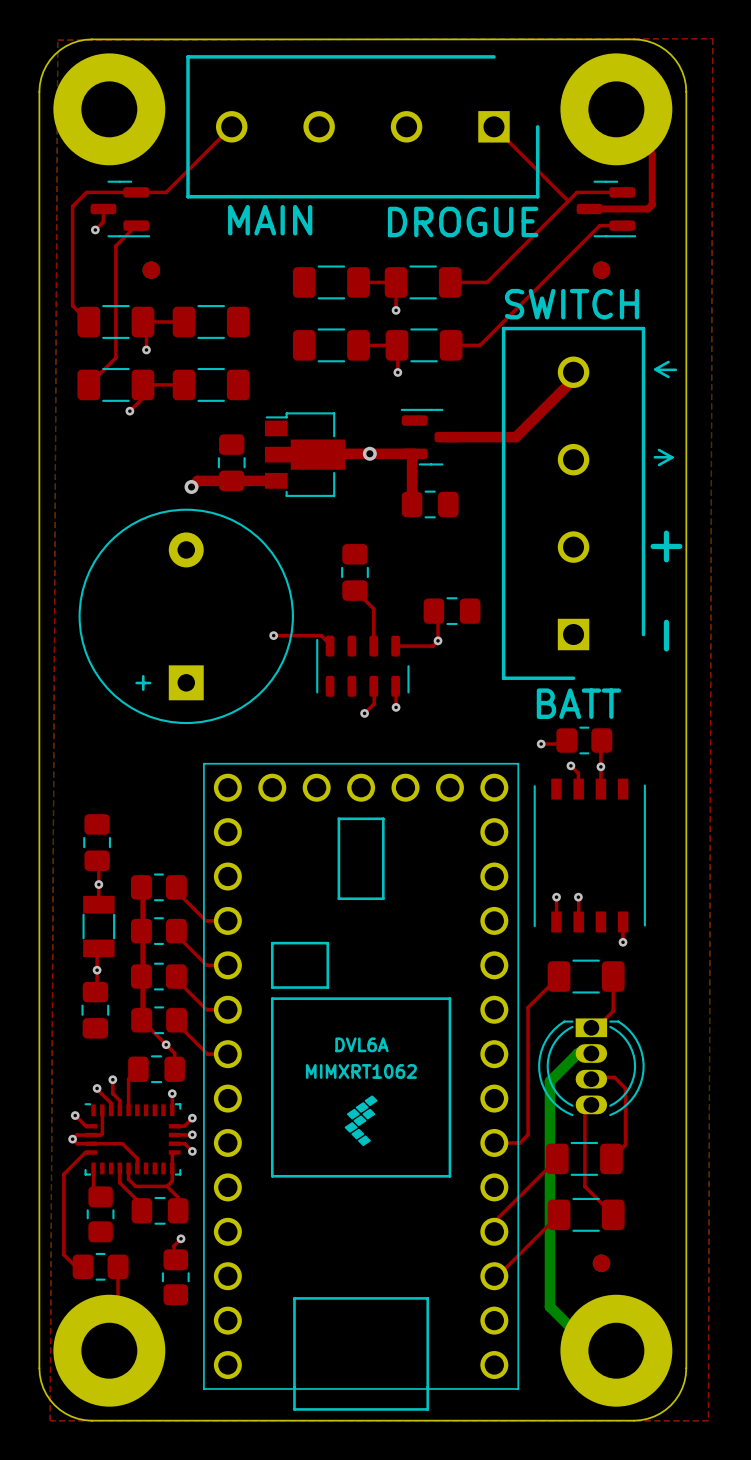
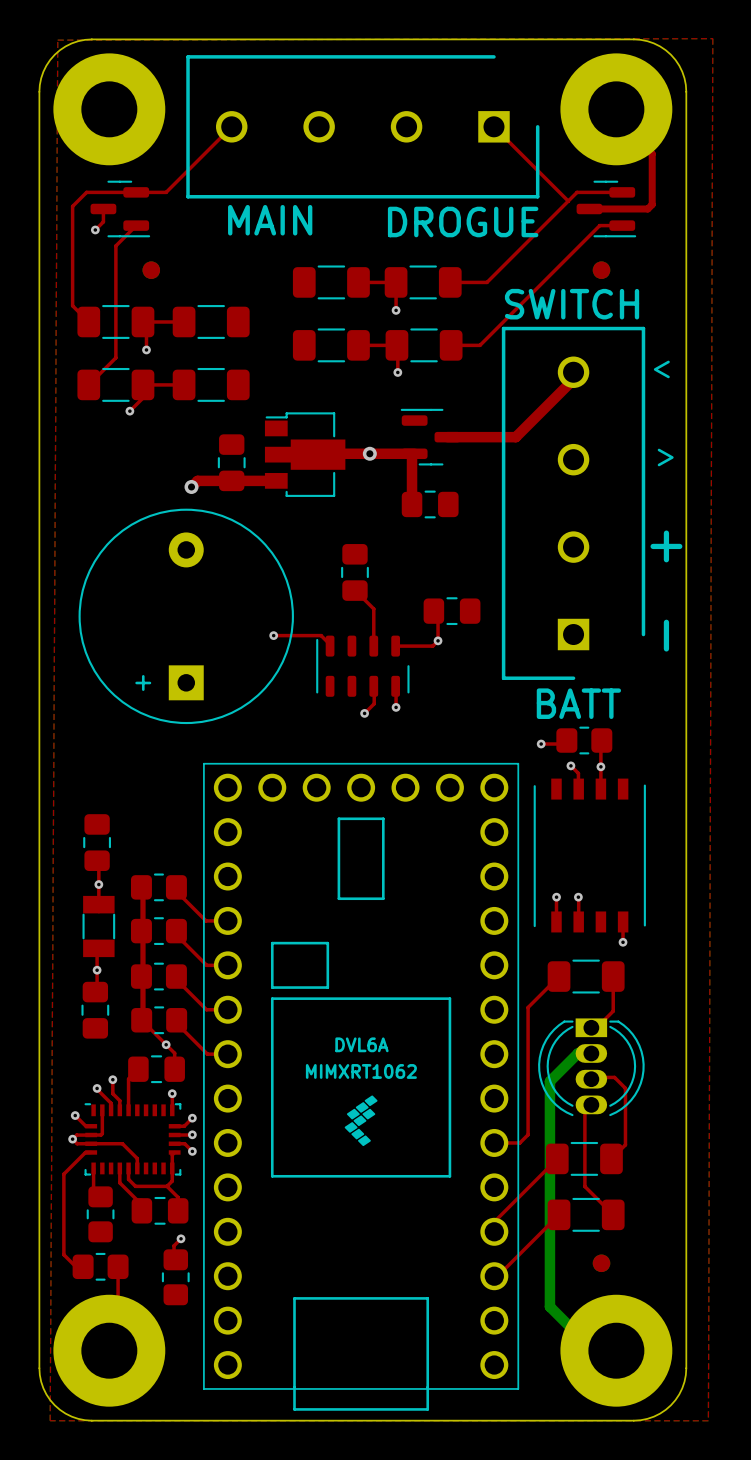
line: (658, 369) (675, 369) -> none
line: (654, 457) (672, 457) -> none

